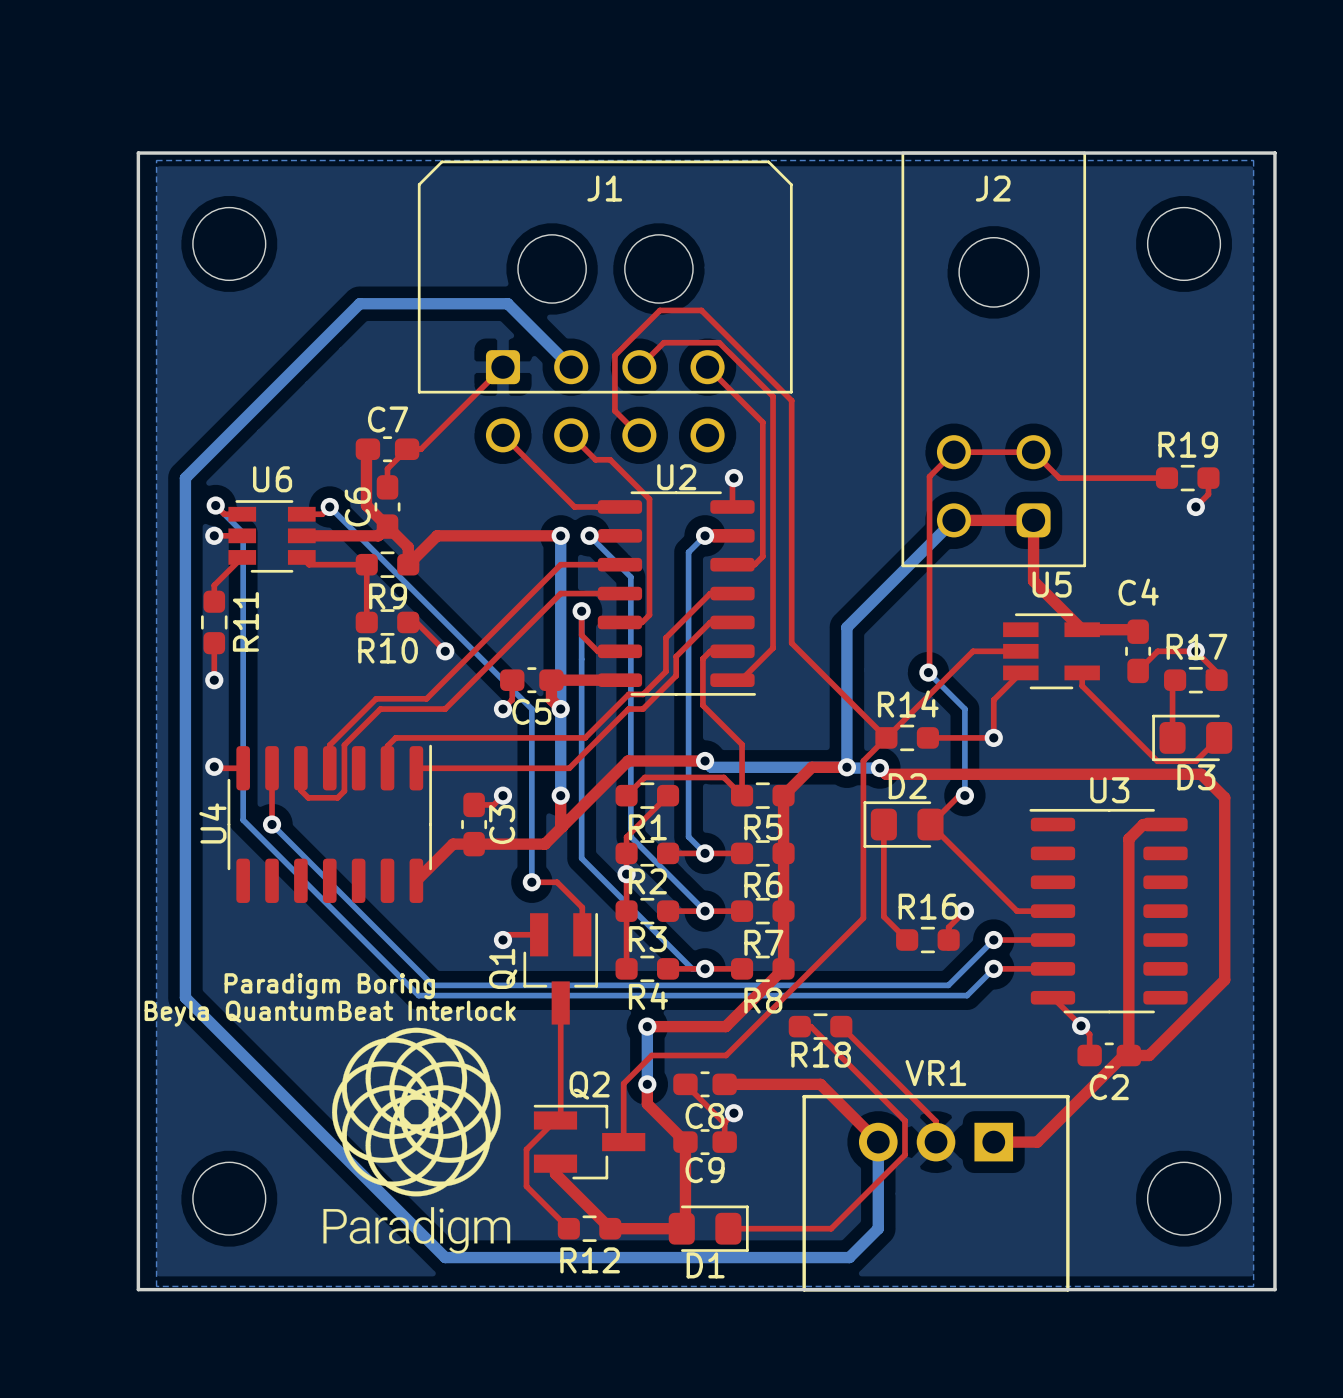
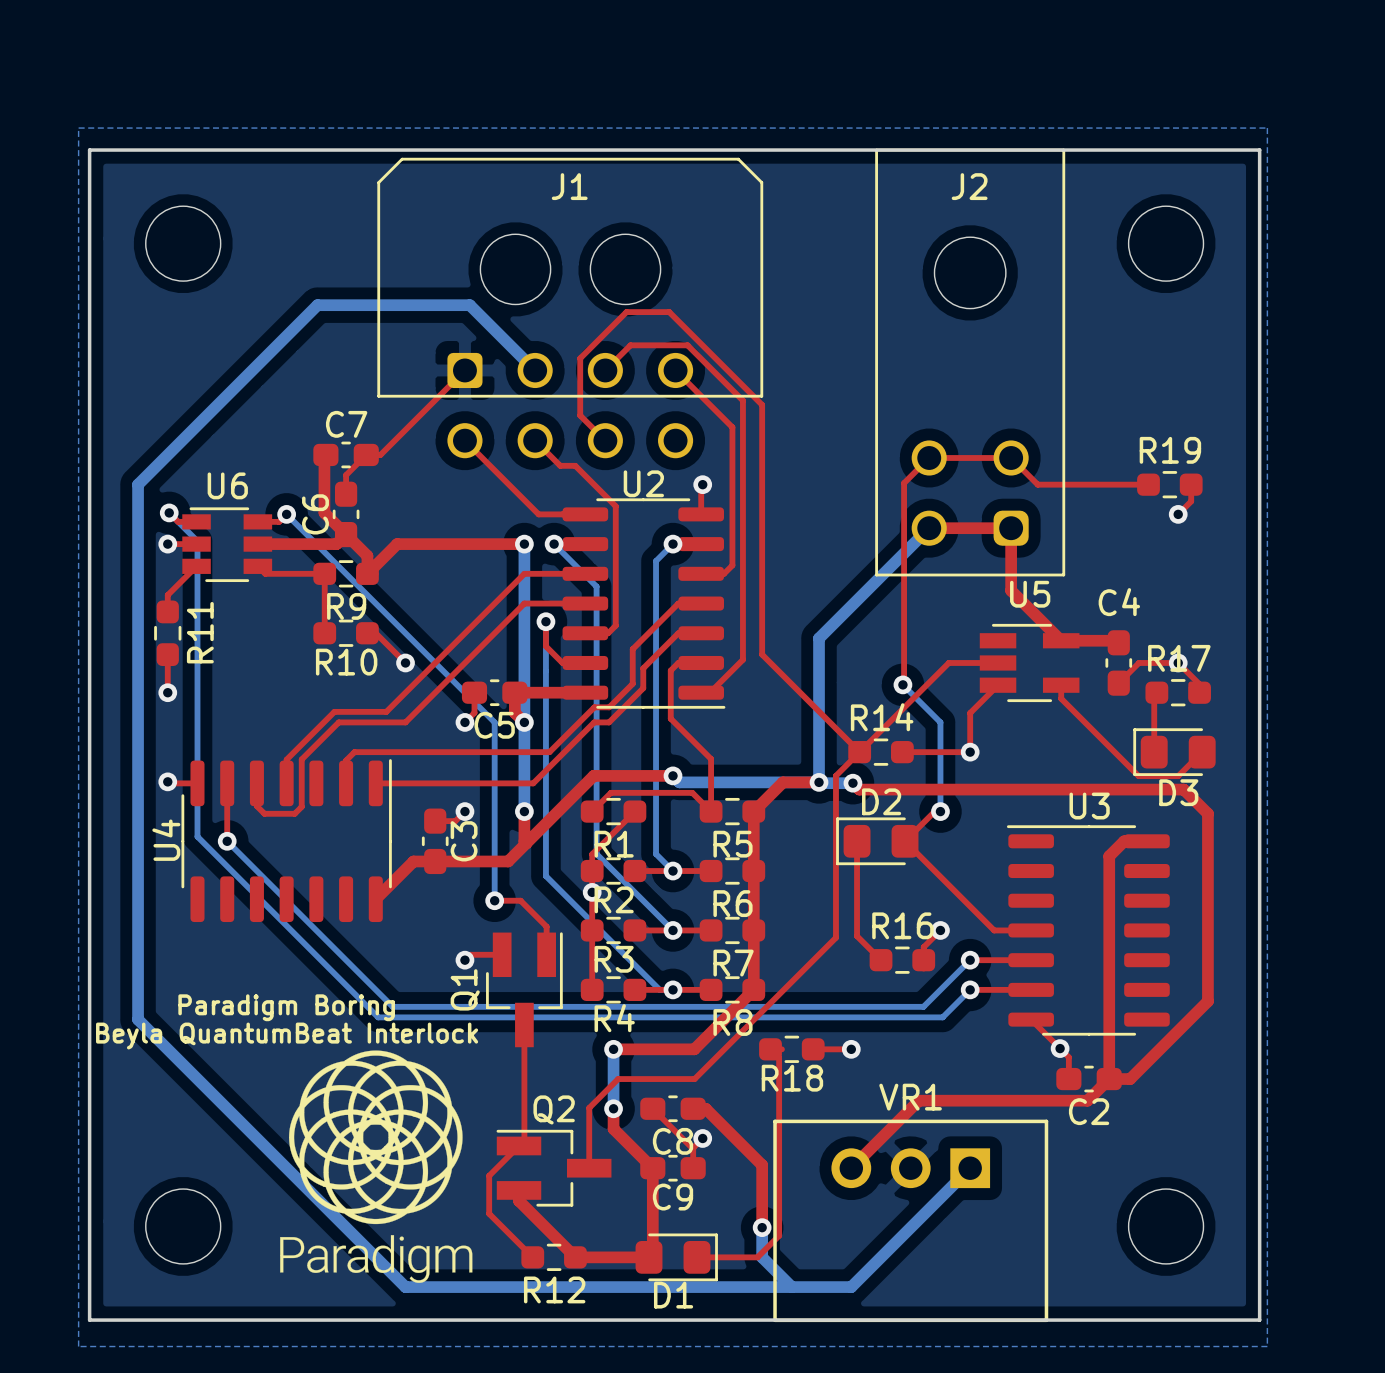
bottom zone outline: (156, 160) (156, 1286) (1253, 1286) (1253, 160) (156, 160) -> (78, 128) (78, 1346) (1267, 1346) (1267, 128) (78, 128)
top track: (810, 1026) (905, 1120) (905, 1154) (831, 1228) (787, 1228) -> (770, 1049) (779, 1057) (779, 1235) (757, 1257)
top track: (841, 1026) (936, 1121) (936, 1142) -> (813, 1049) (851, 1049)
via: none -> (851, 1049)
top track: (1123, 1055) (1037, 1142) (993, 1142) -> none
top track: none -> (1109, 1079) (1087, 1100) (918, 1100) (851, 1168)
top track: (736, 1084) (820, 1084) (878, 1142) -> (705, 1108) (762, 1165) (762, 1227)
bottom track: (878, 1142) (878, 1228) (849, 1257) -> (970, 1168) (851, 1287) (821, 1287)
bottom track: none -> (762, 1227) (762, 1257) (791, 1287)
via: none -> (762, 1227)

